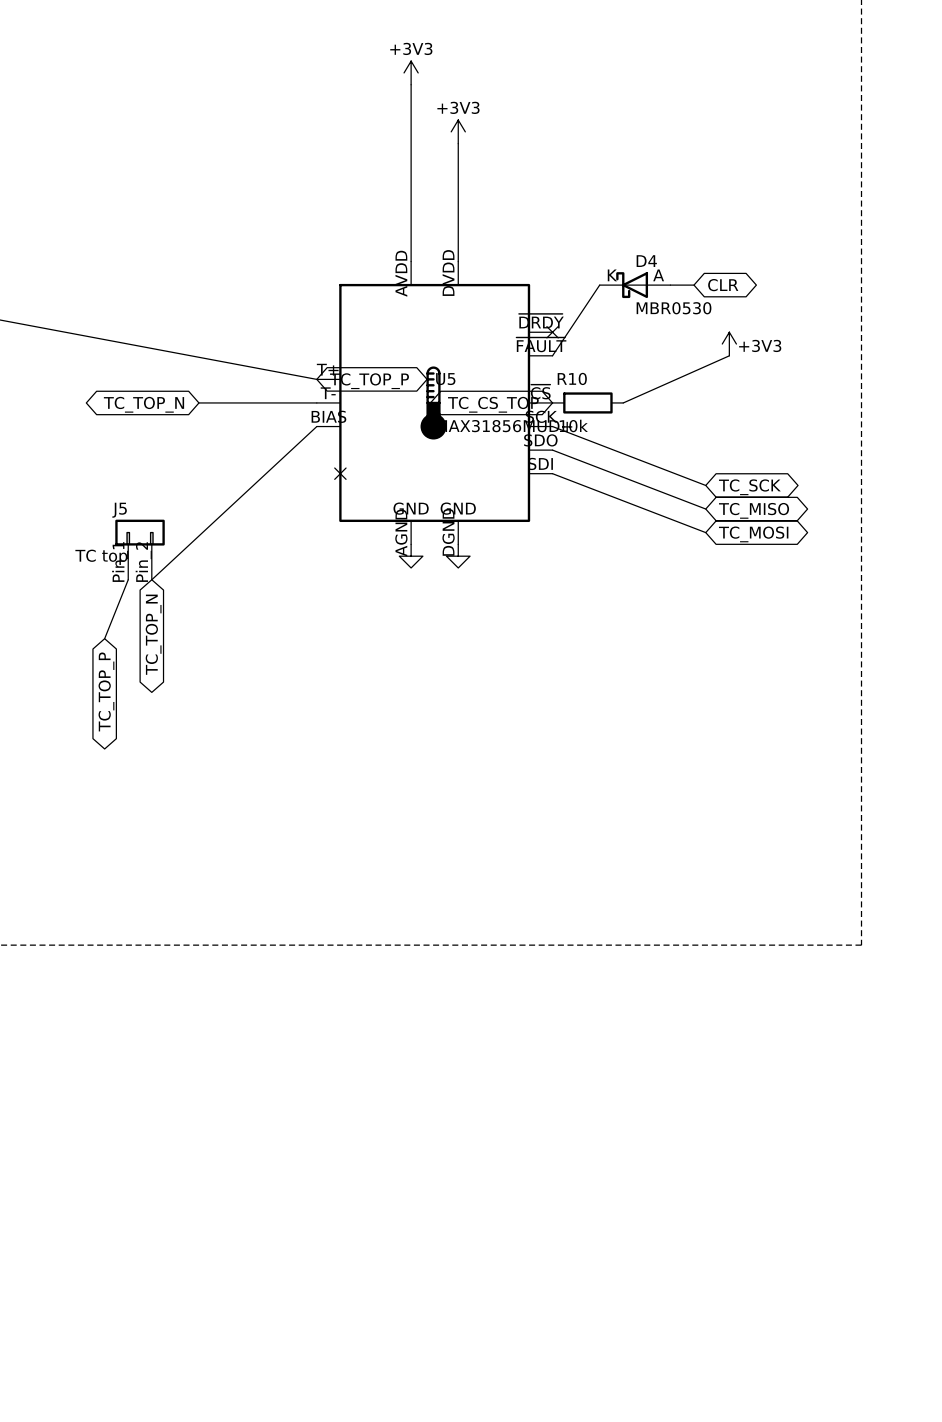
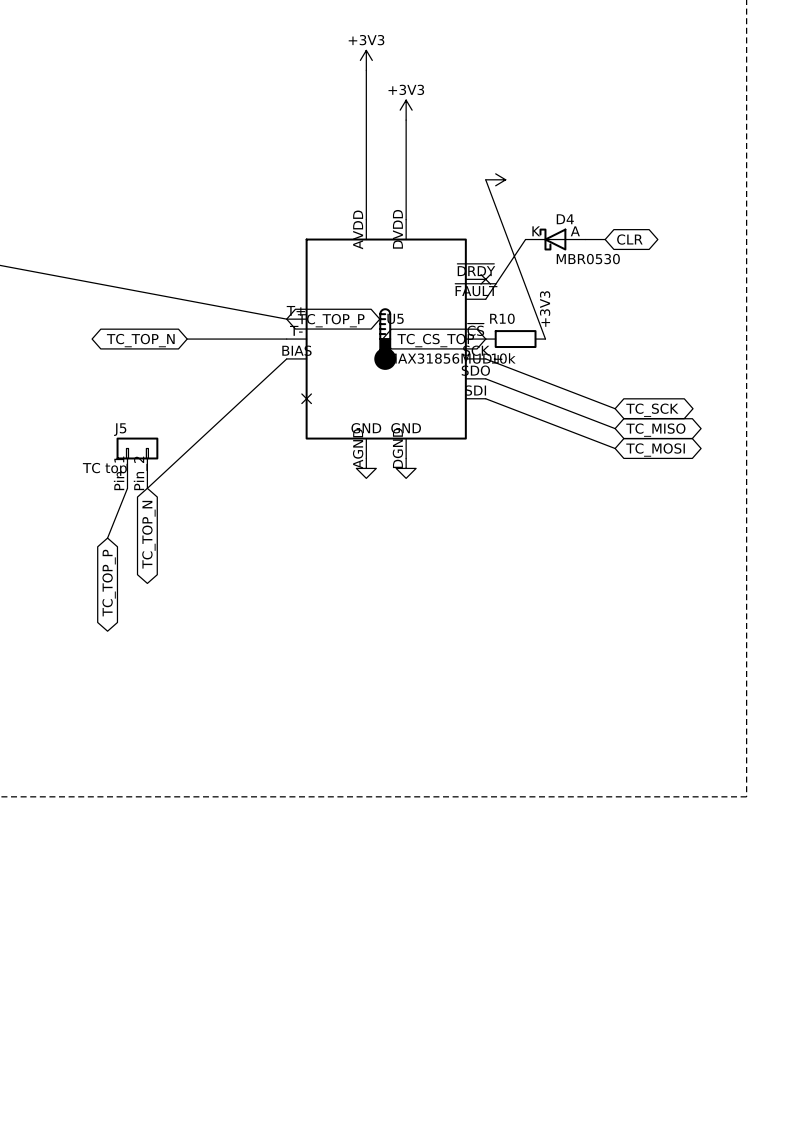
power symbol rotation: 0° (729, 344) -> 90° clockwise (495, 179)
power symbol position: +3V3 (729, 344) -> +3V3 (495, 179)
power symbol text position: +3V3 (760, 345) -> +3V3 (545, 309)
wire: (729, 355) (623, 402) -> (485, 179) (545, 339)

